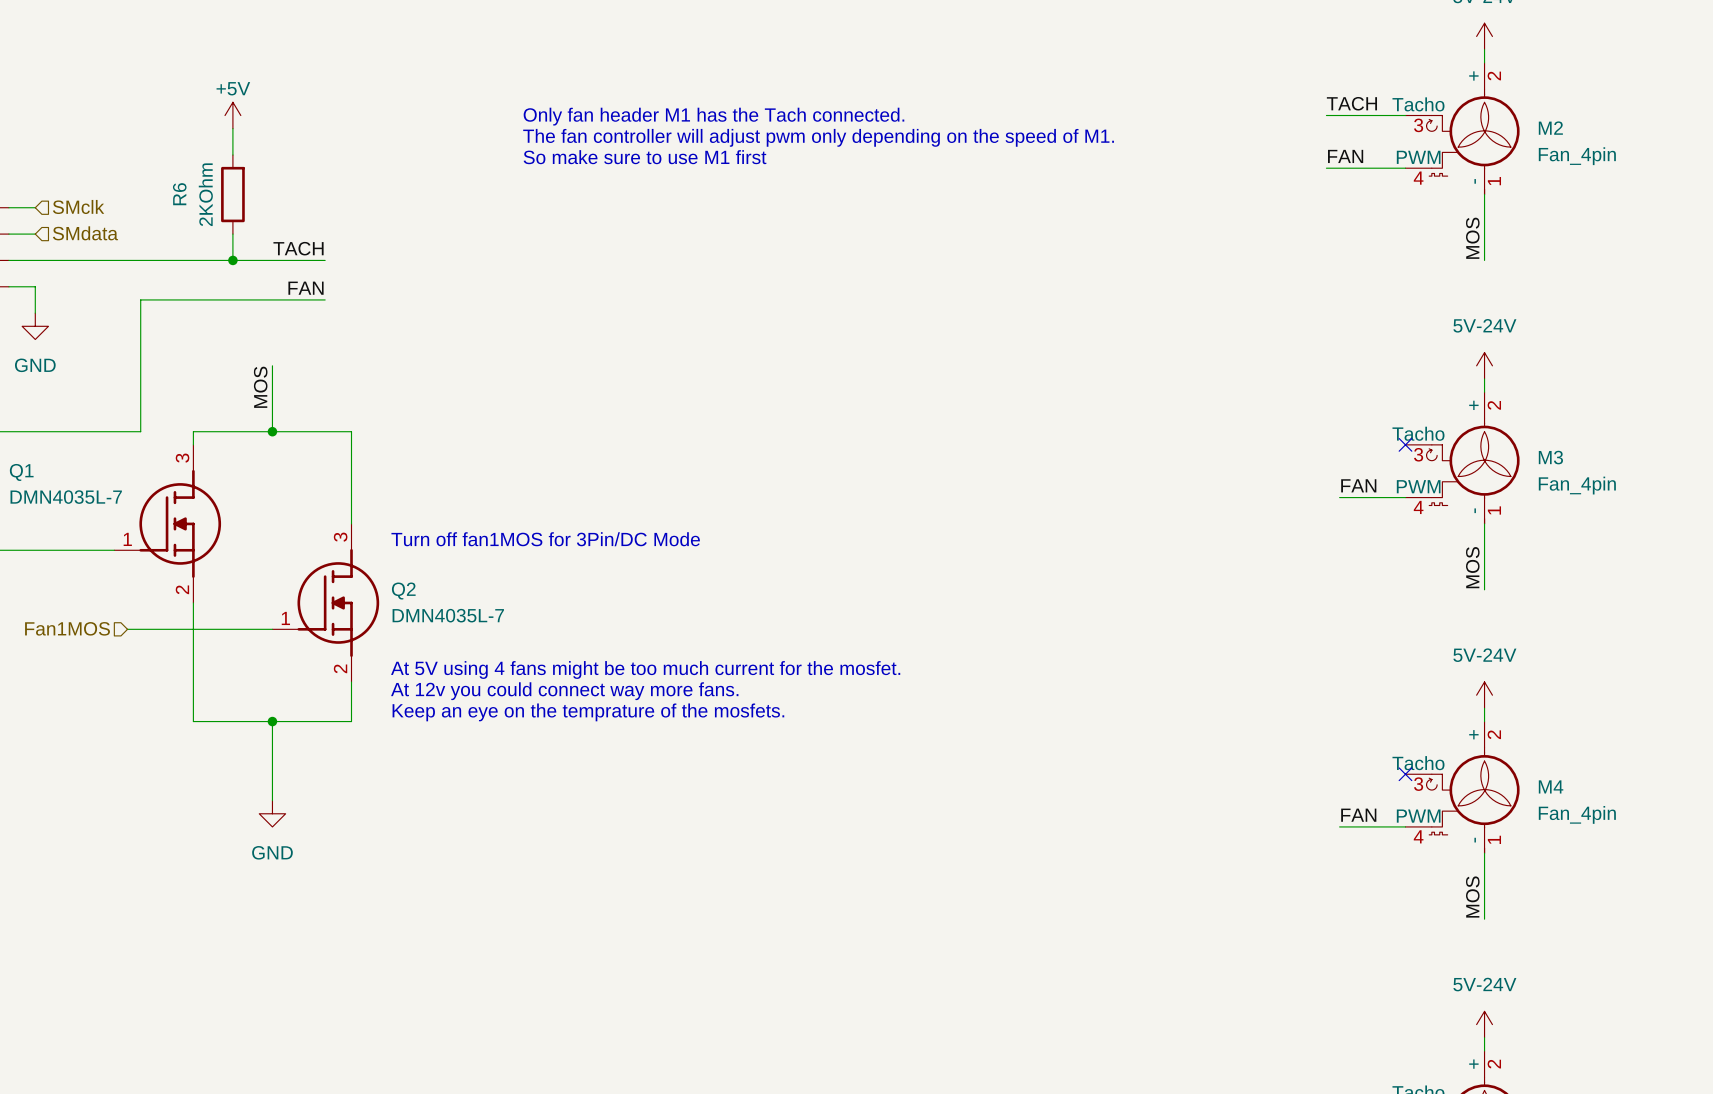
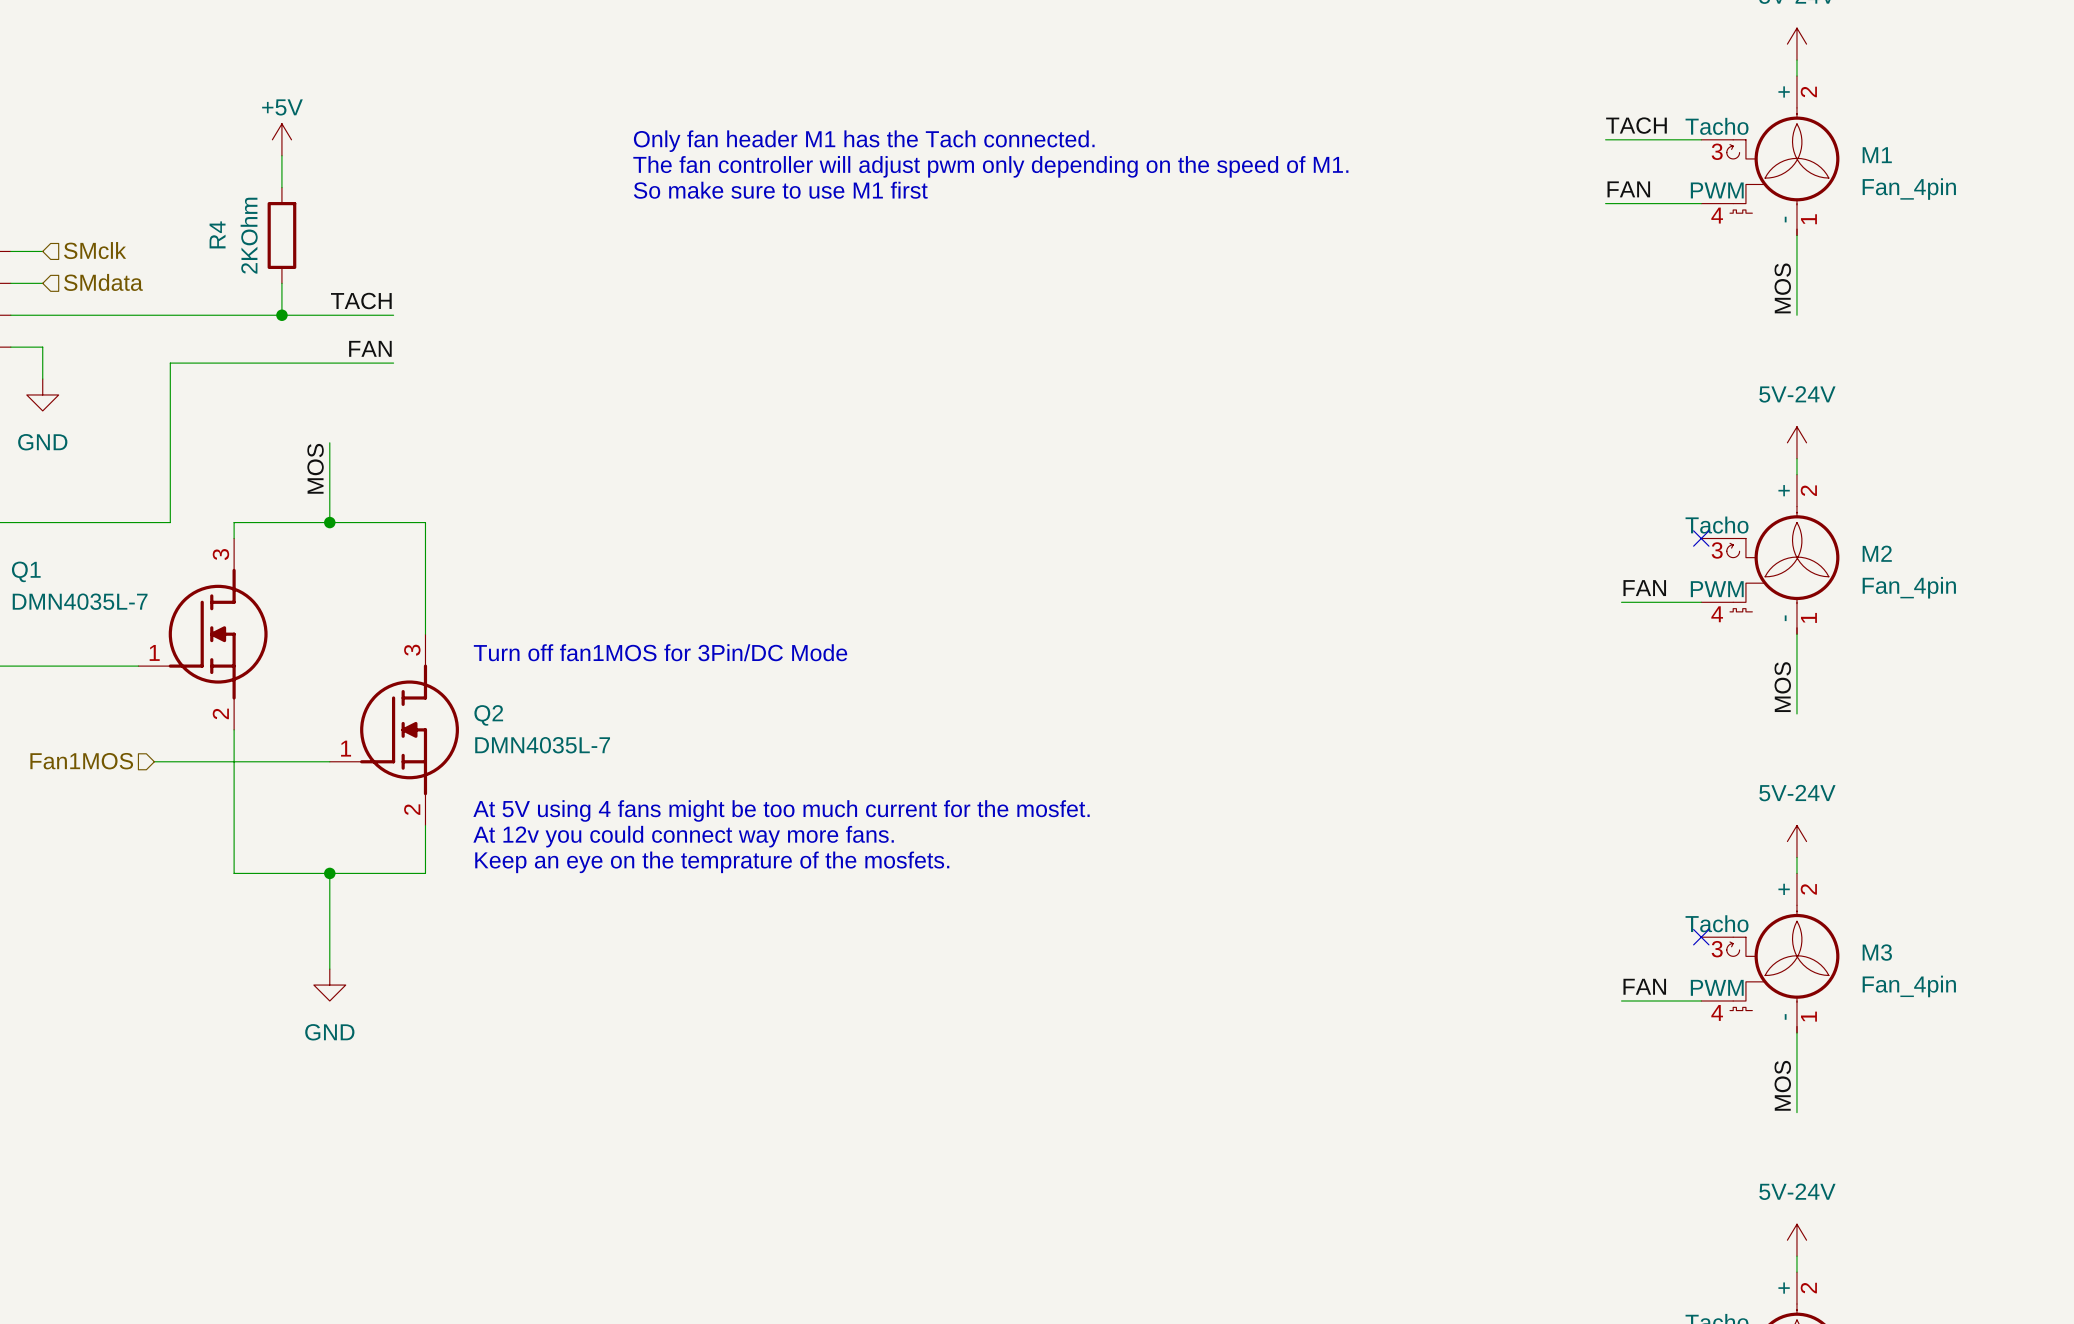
M2 name: M2 (1550, 128) -> M1 (1877, 155)
R6 name: R6 (179, 194) -> R4 (217, 234)
M3 name: M3 (1550, 457) -> M2 (1877, 553)
M4 name: M4 (1551, 786) -> M3 (1877, 952)

